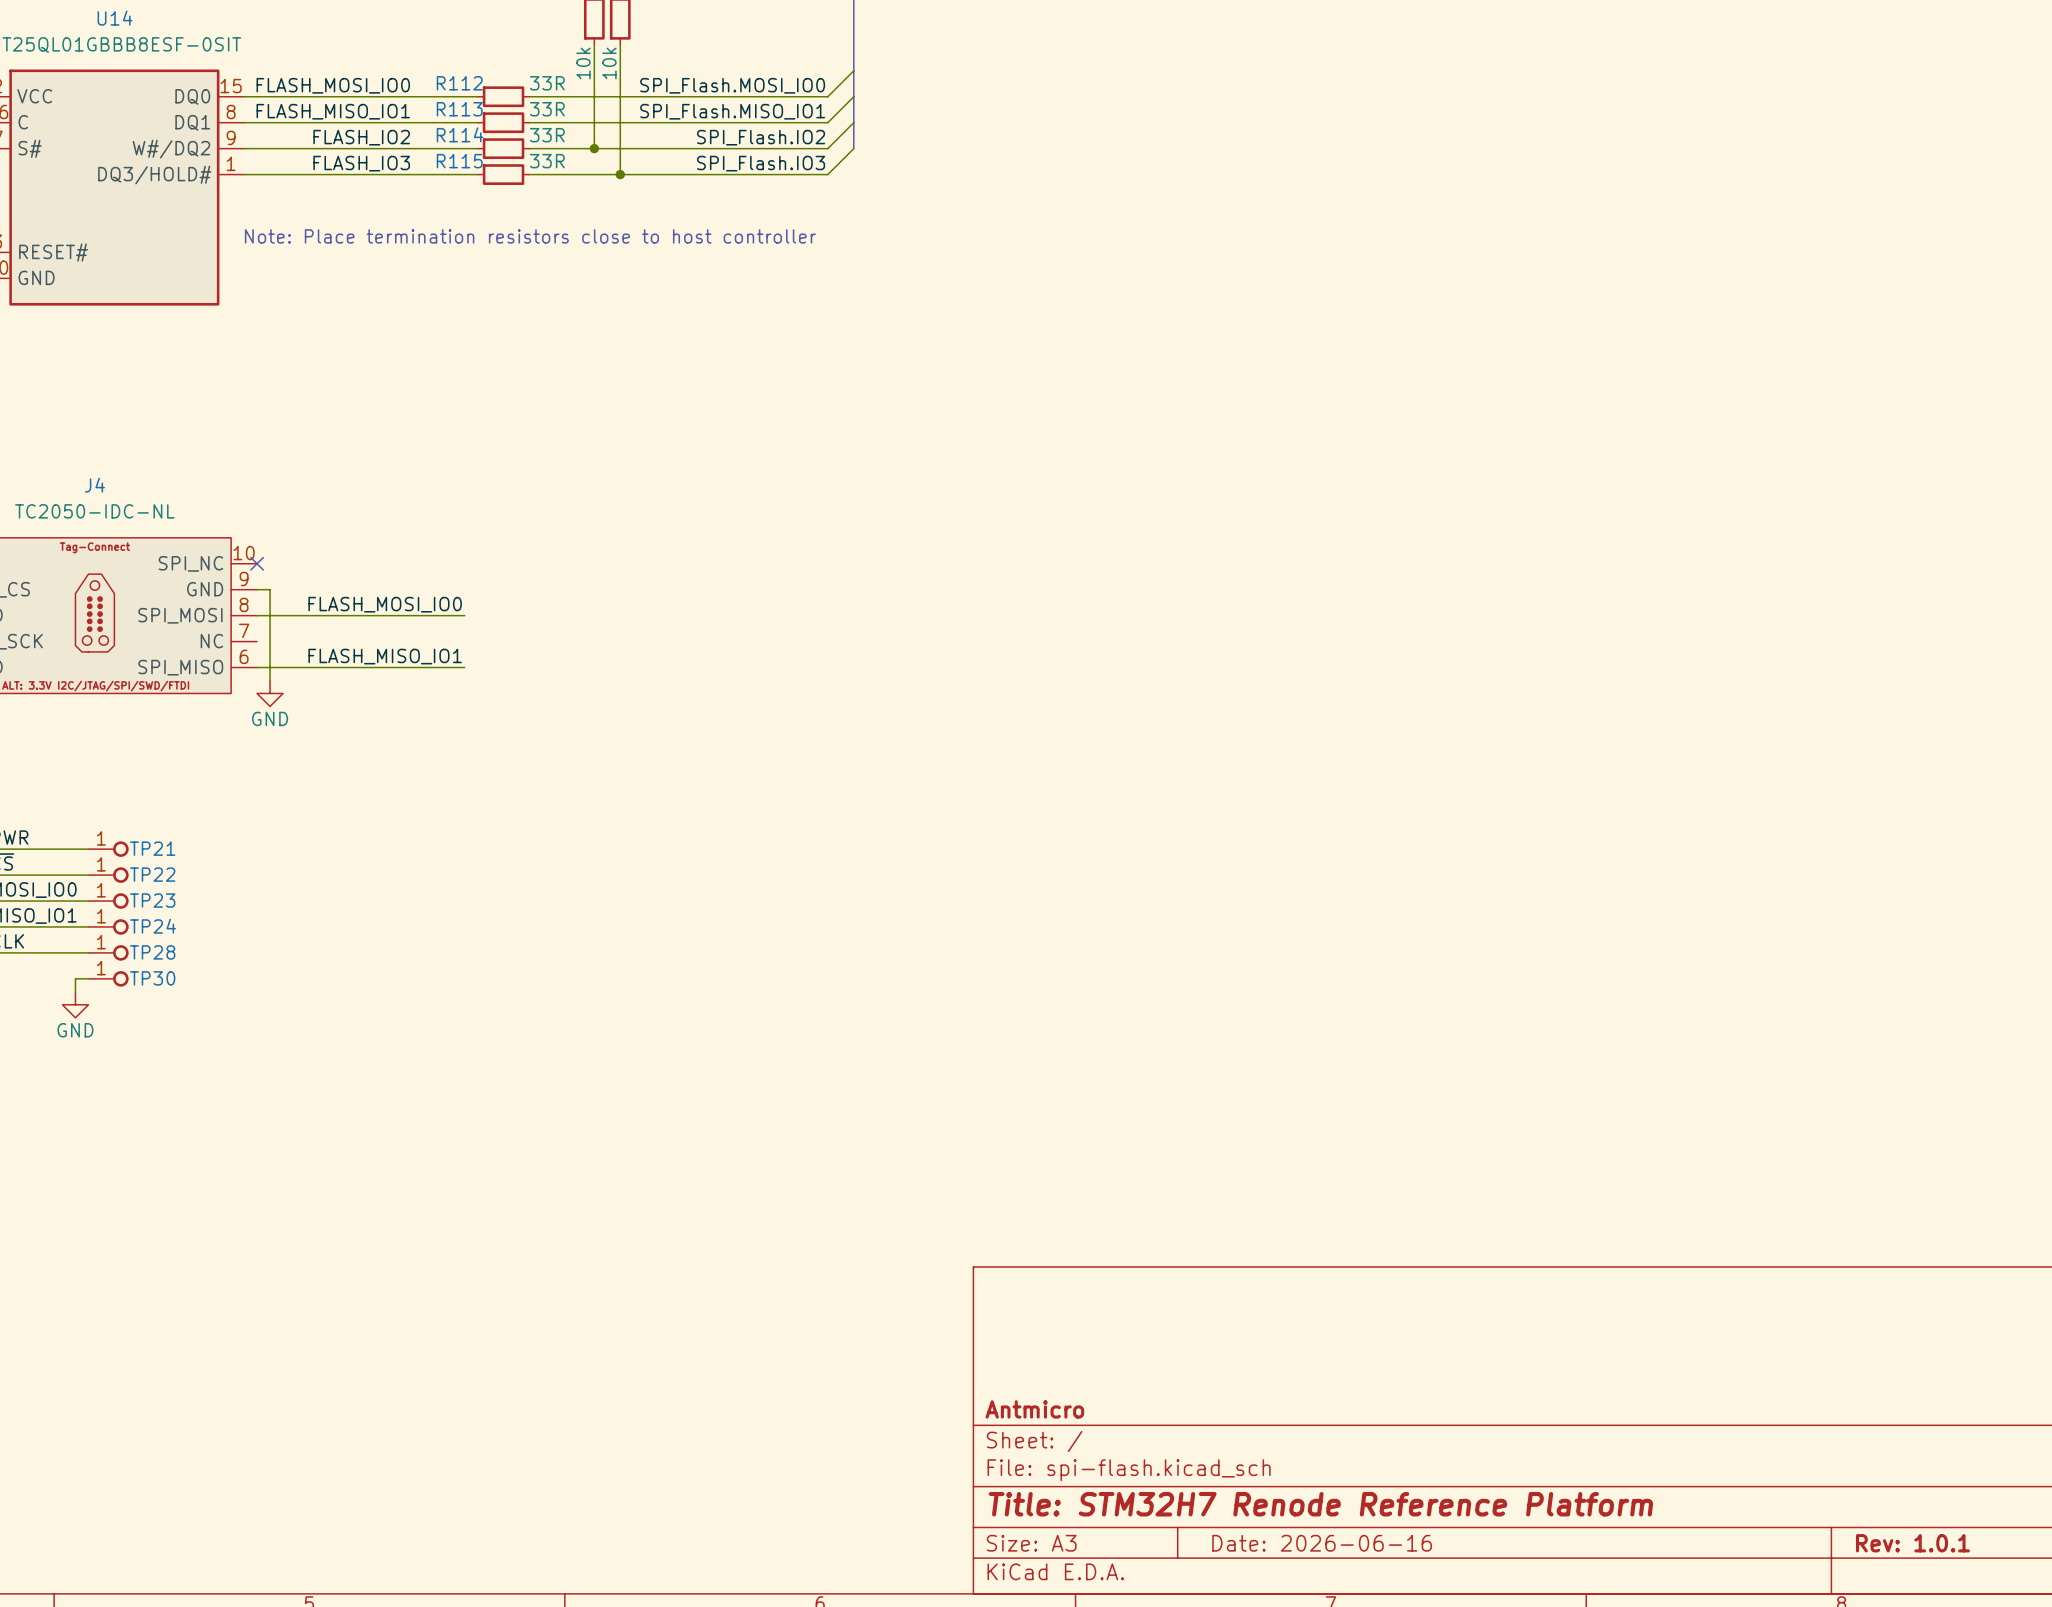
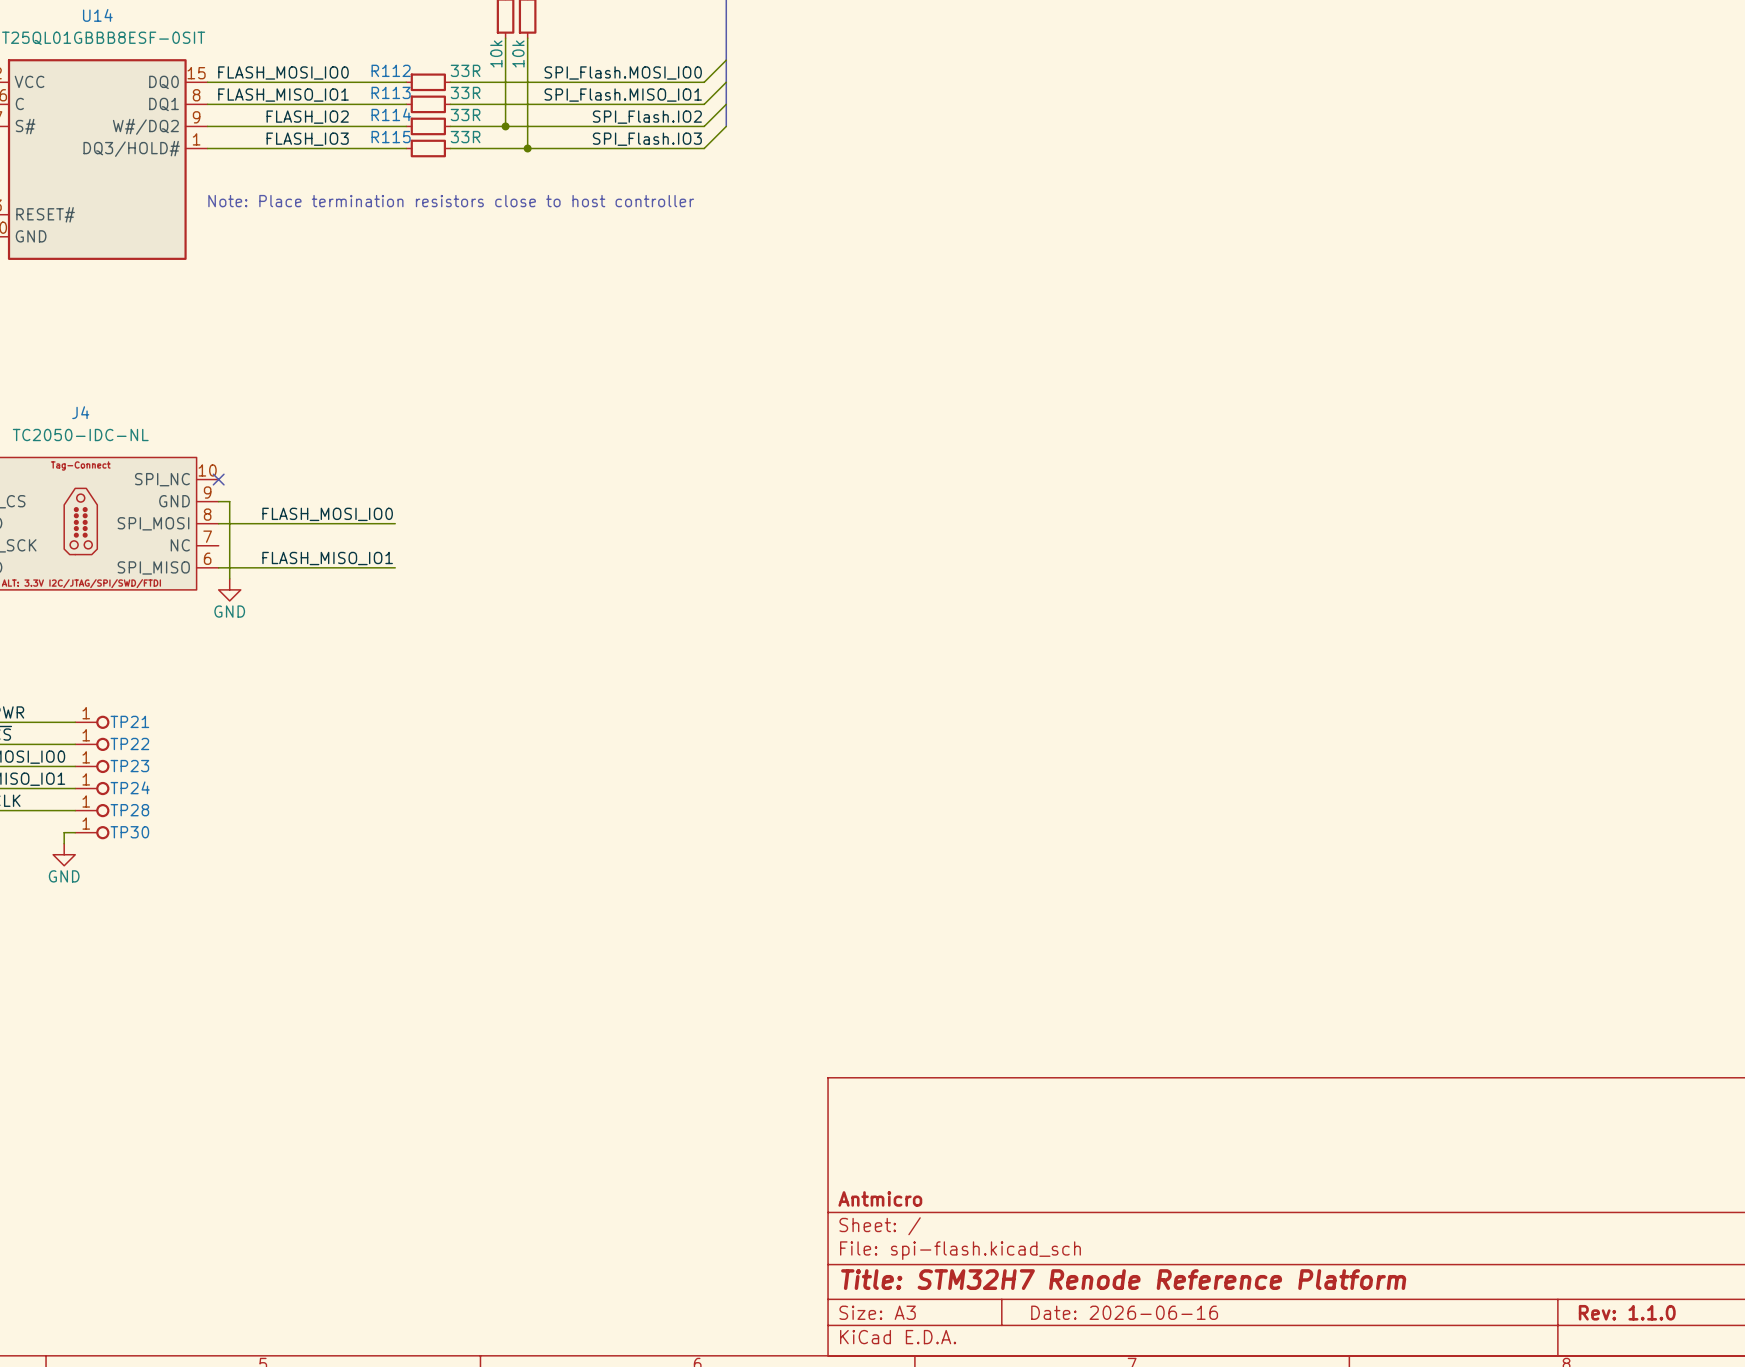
title block: Rev: 1.0.1 (1912, 1543) -> Rev: 1.1.0 (1627, 1312)

